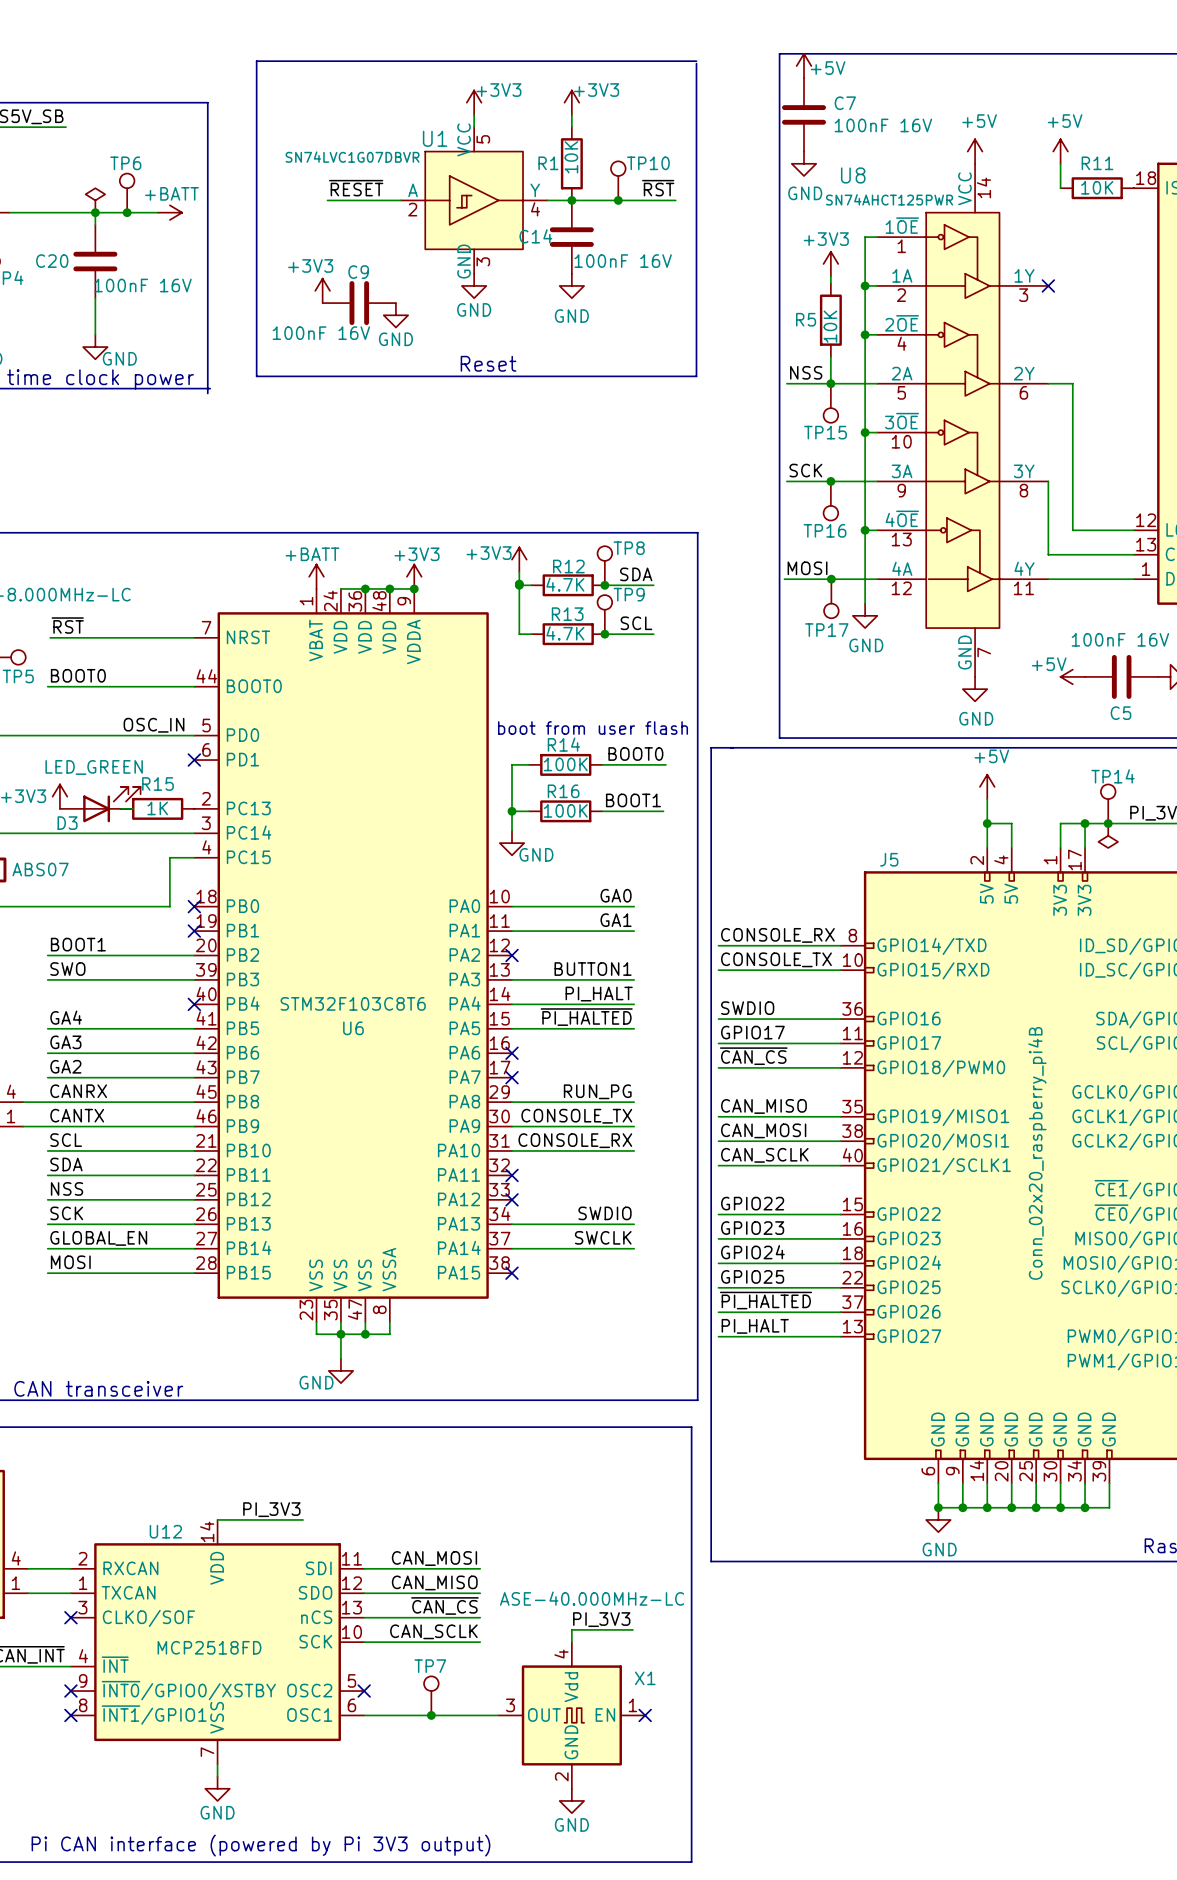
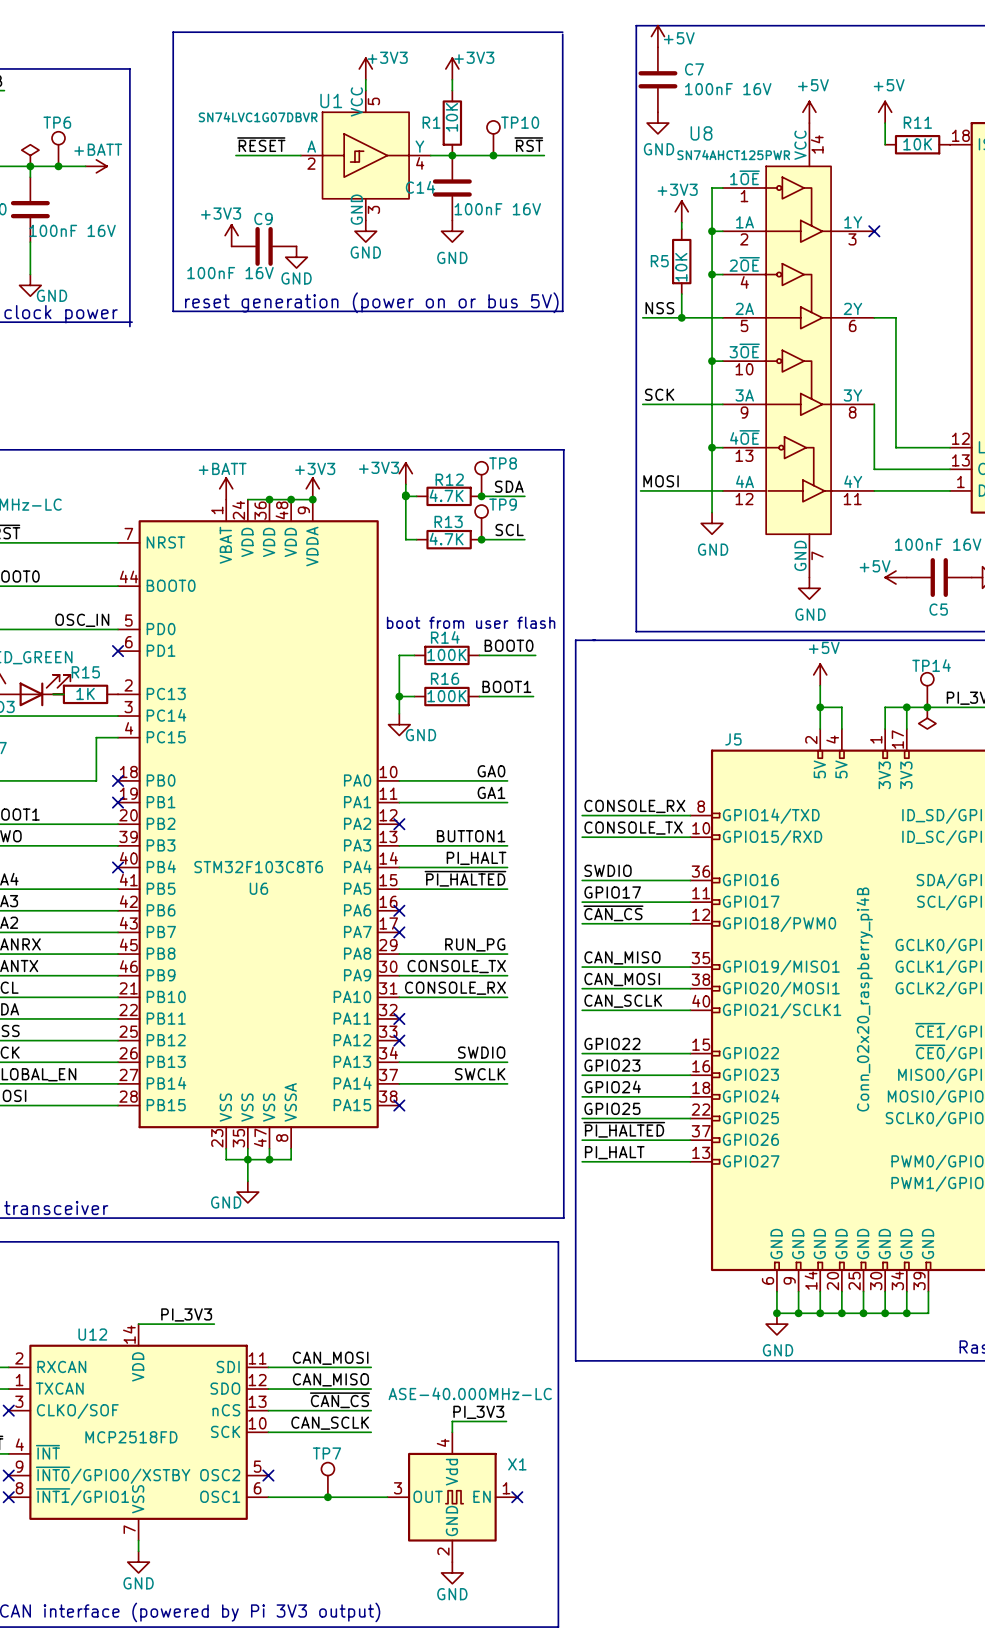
text: Reset (488, 363) -> none
text: none -> reset generation (power on or bus 5V) (371, 302)
TP15: (830, 403) -> none
junction: (830, 481) -> none
TP16: (830, 501) -> none
junction: (831, 579) -> none
TP17: (831, 598) -> none

